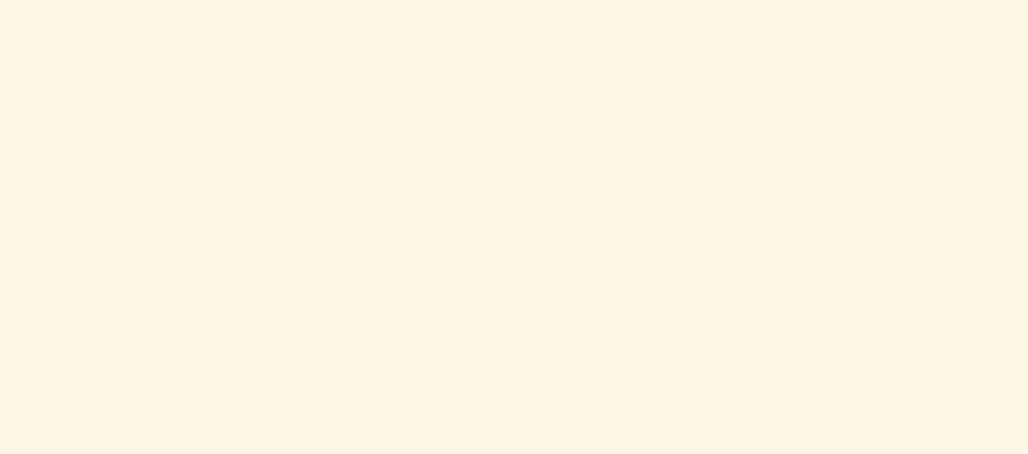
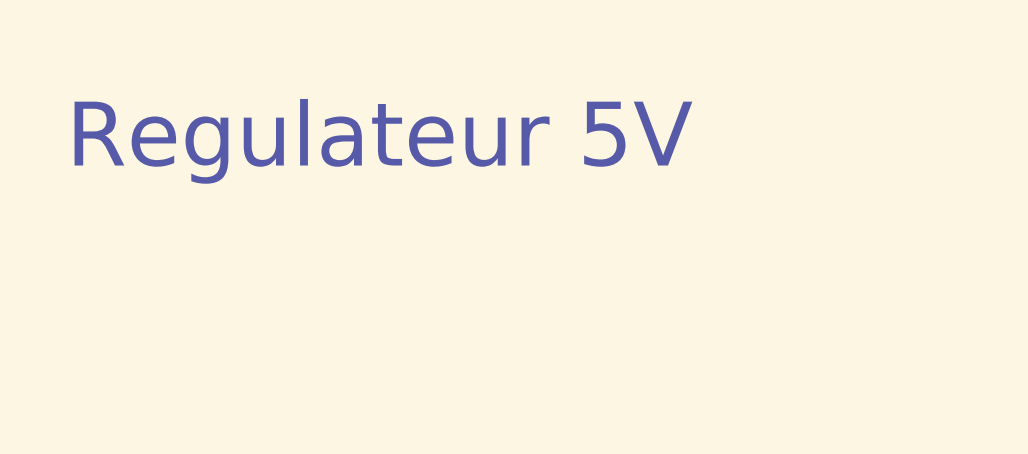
text: none -> Regulateur 5V (383, 141)

